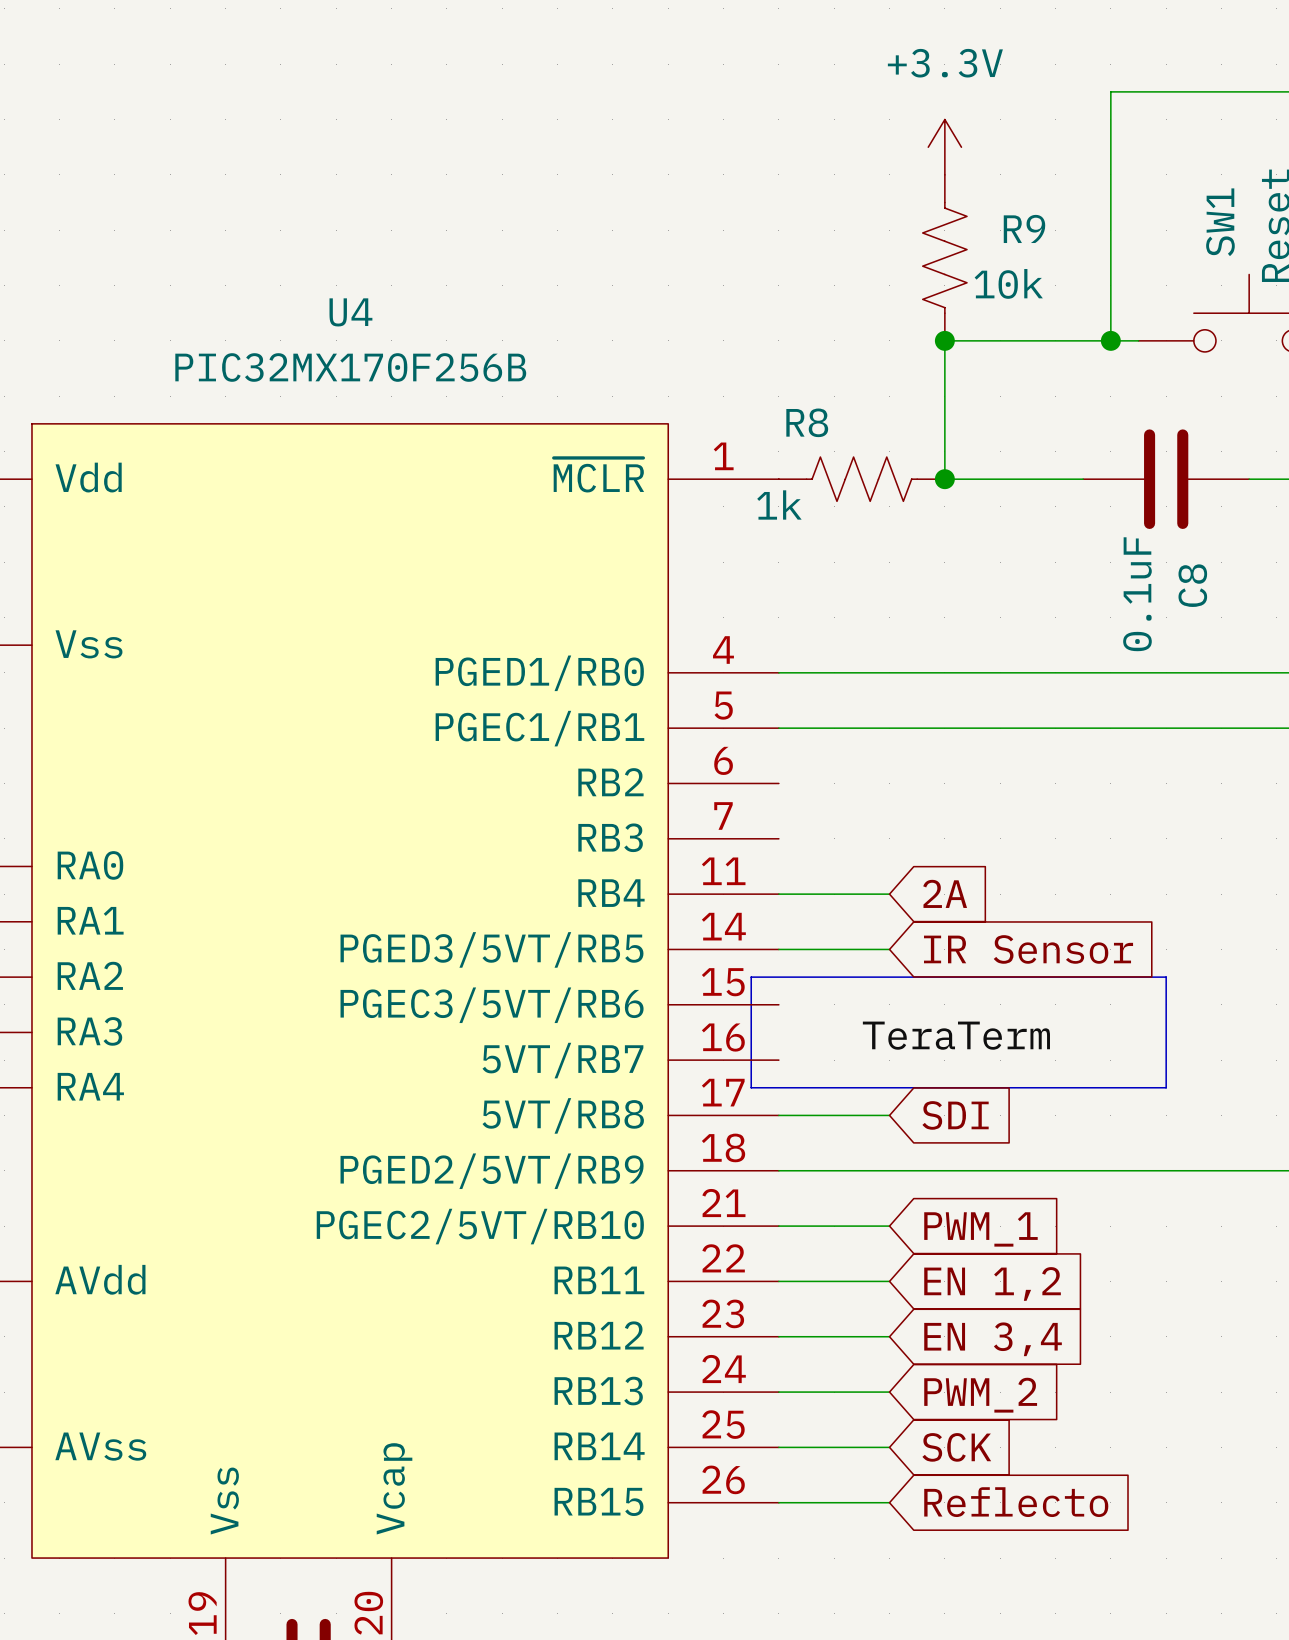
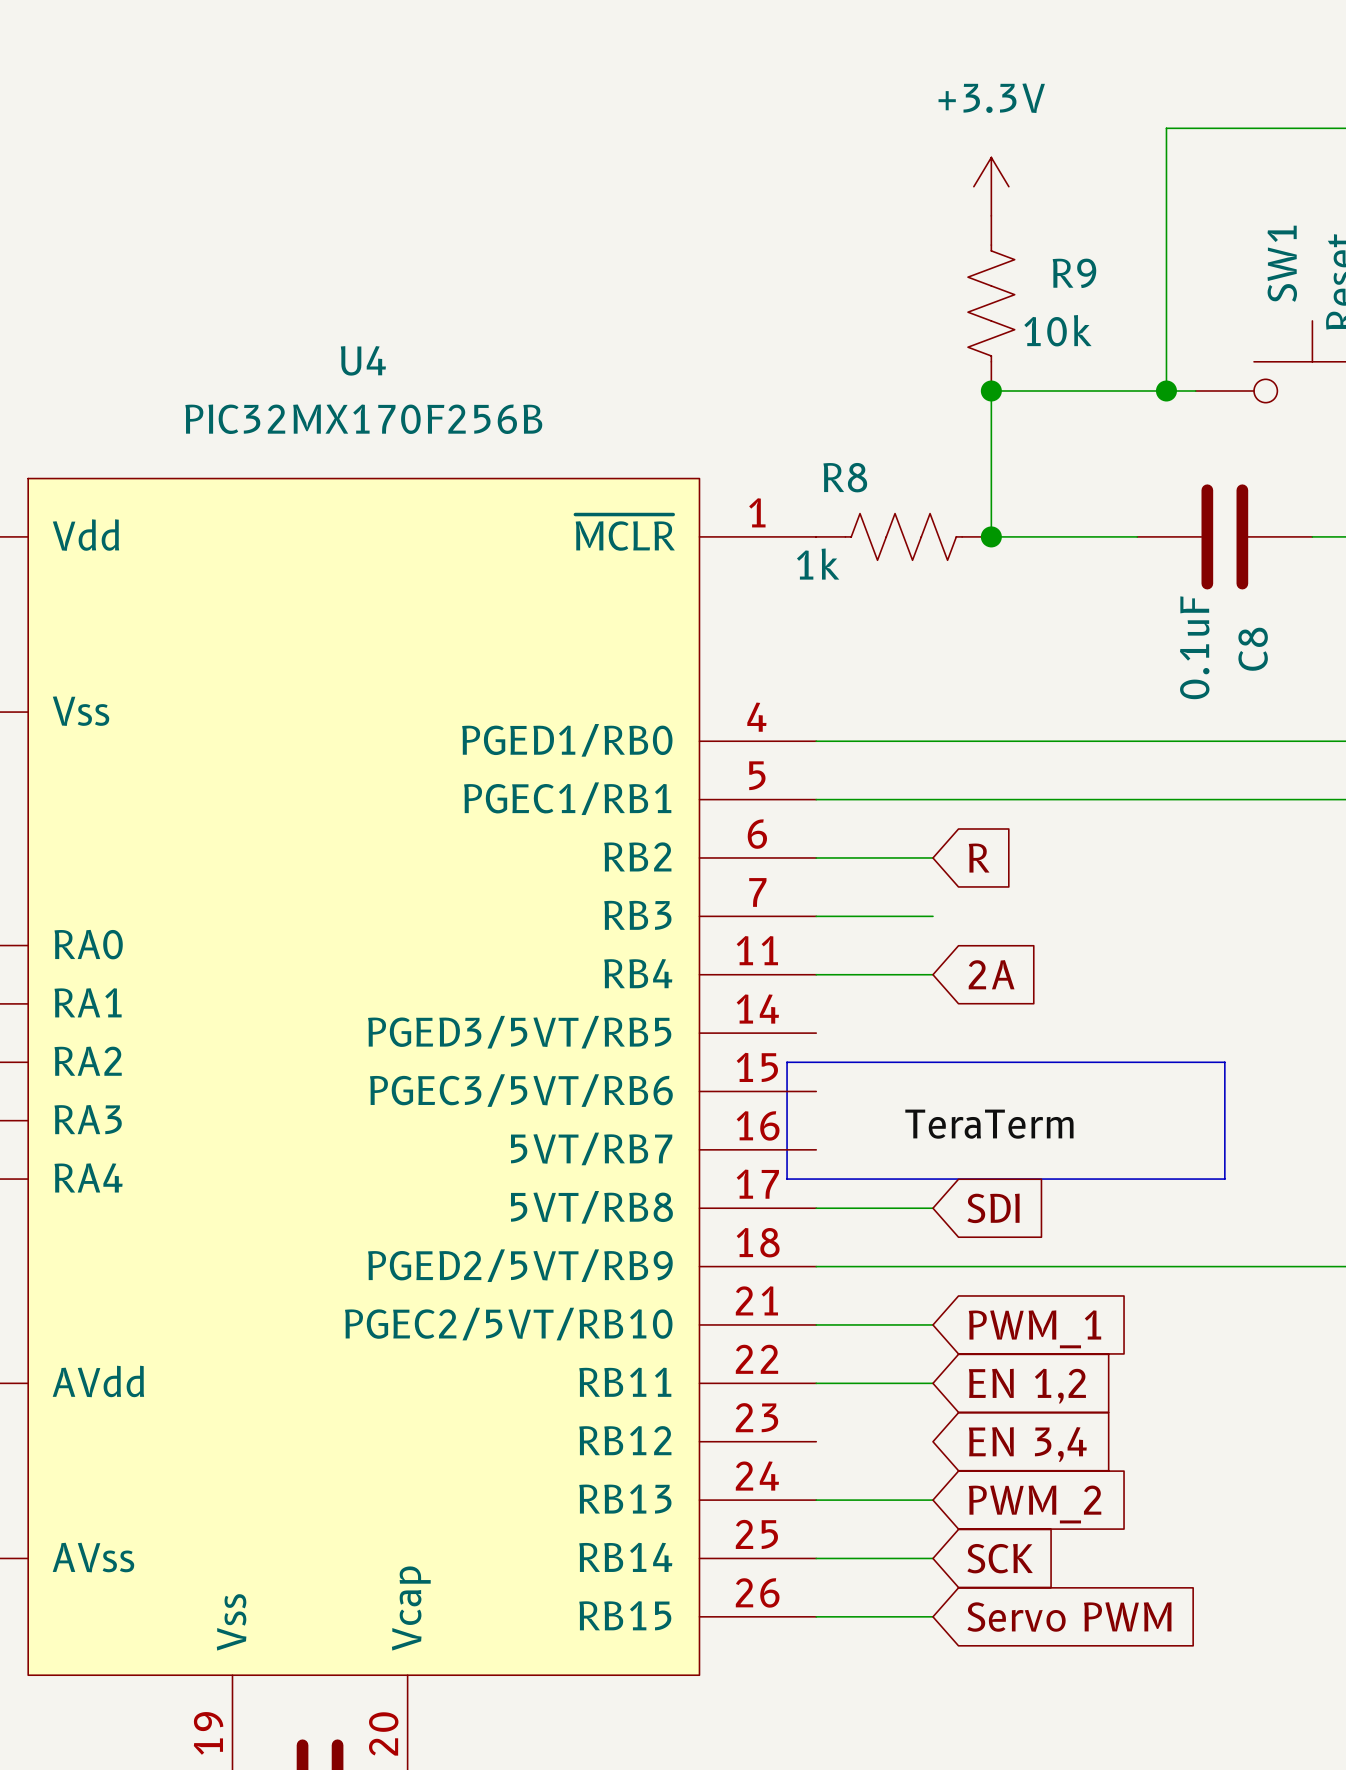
wire: none -> (816, 857) (932, 857)
global label: none -> R (979, 858)
wire: (778, 949) (889, 949) -> (816, 916) (932, 916)
global label: IR Sensor (1028, 949) -> none
wire: (778, 1336) (889, 1336) -> none
global label: Reflecto (1016, 1502) -> Servo PWM (1069, 1617)

